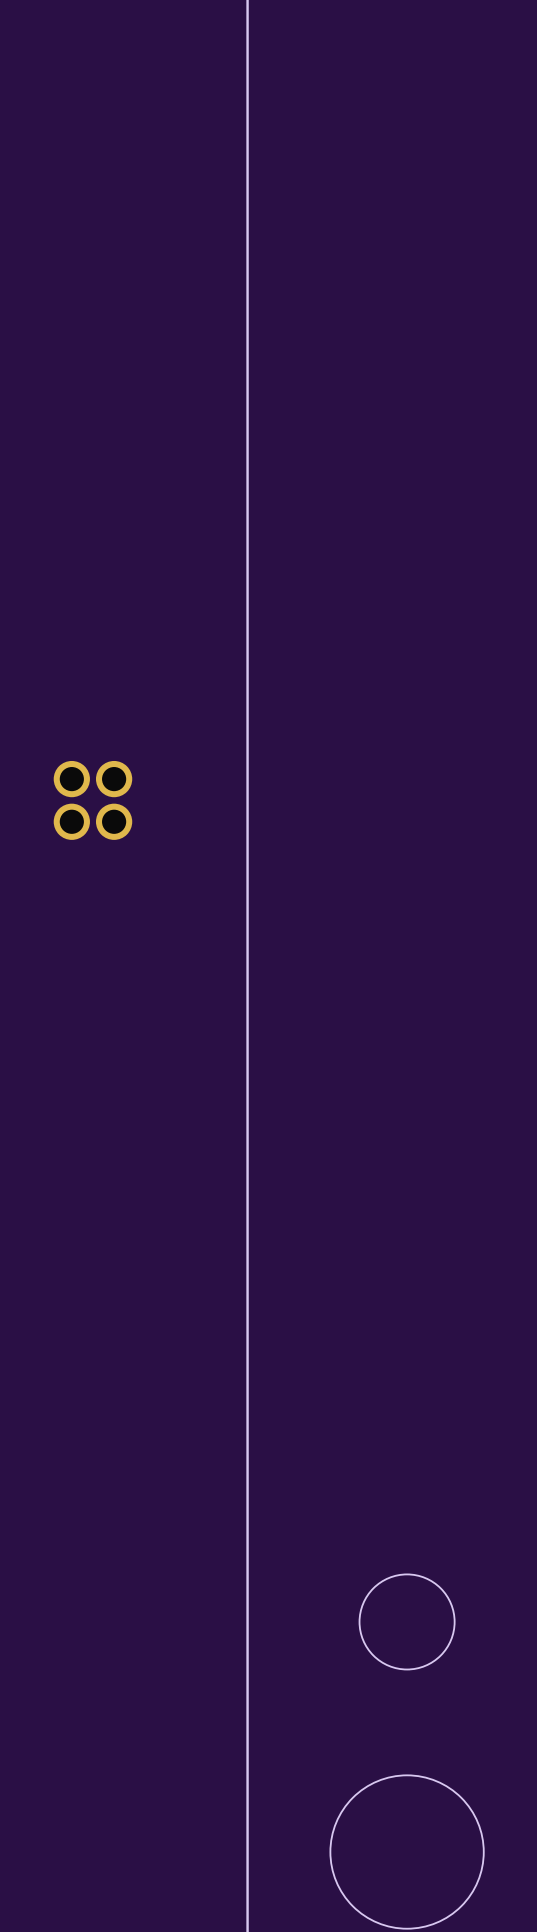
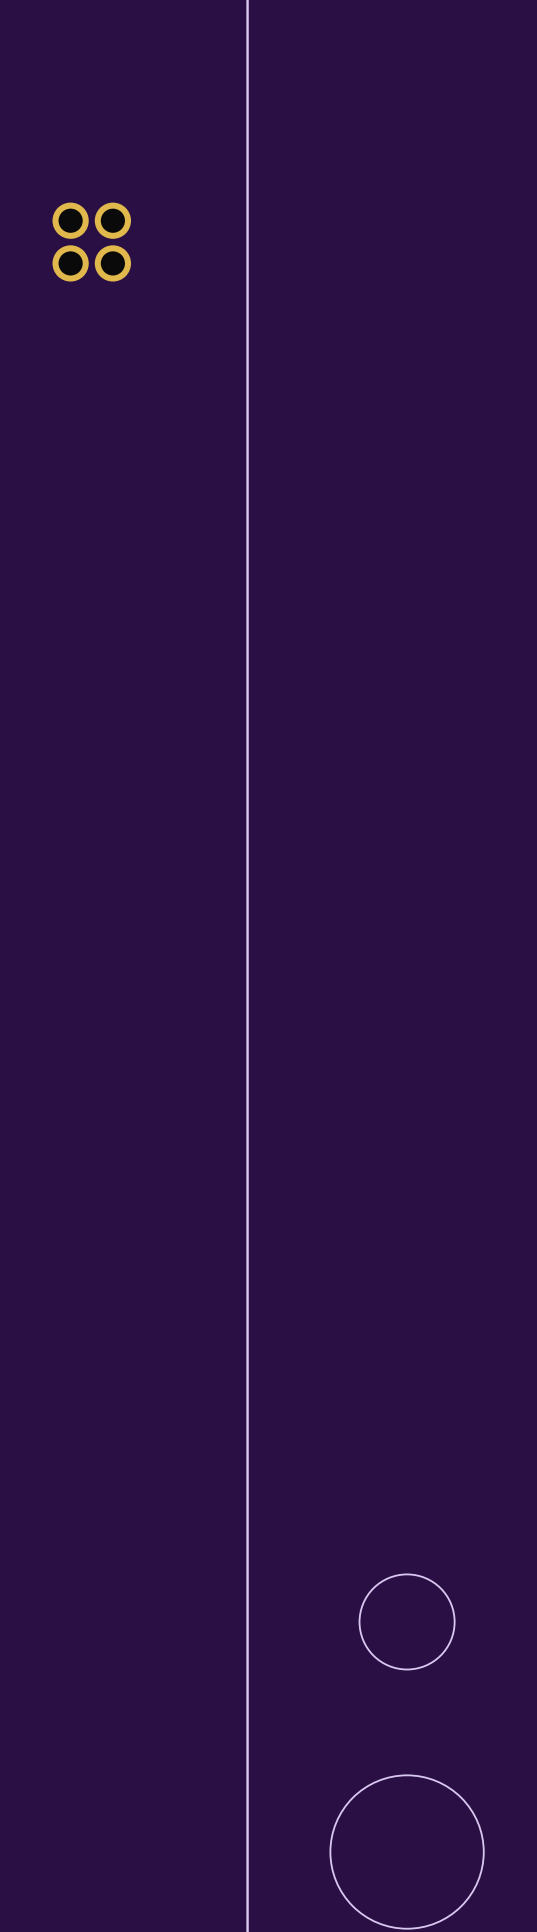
part: none -> (91, 242)
part: (92, 800) -> none

